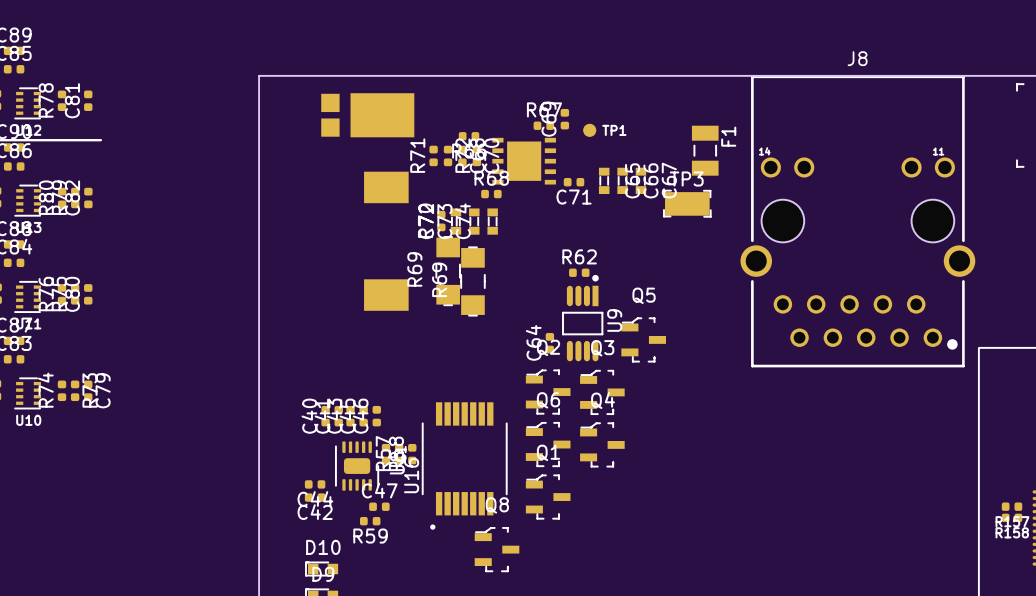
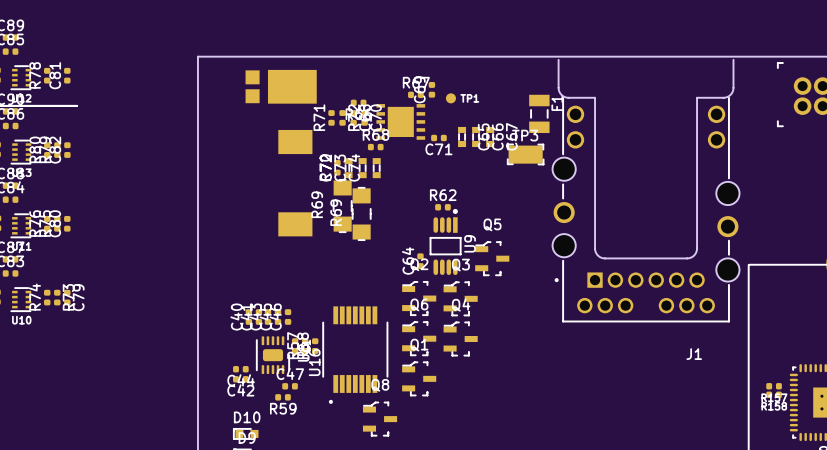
J8: (857, 221) -> none
J1: none -> (646, 190)

